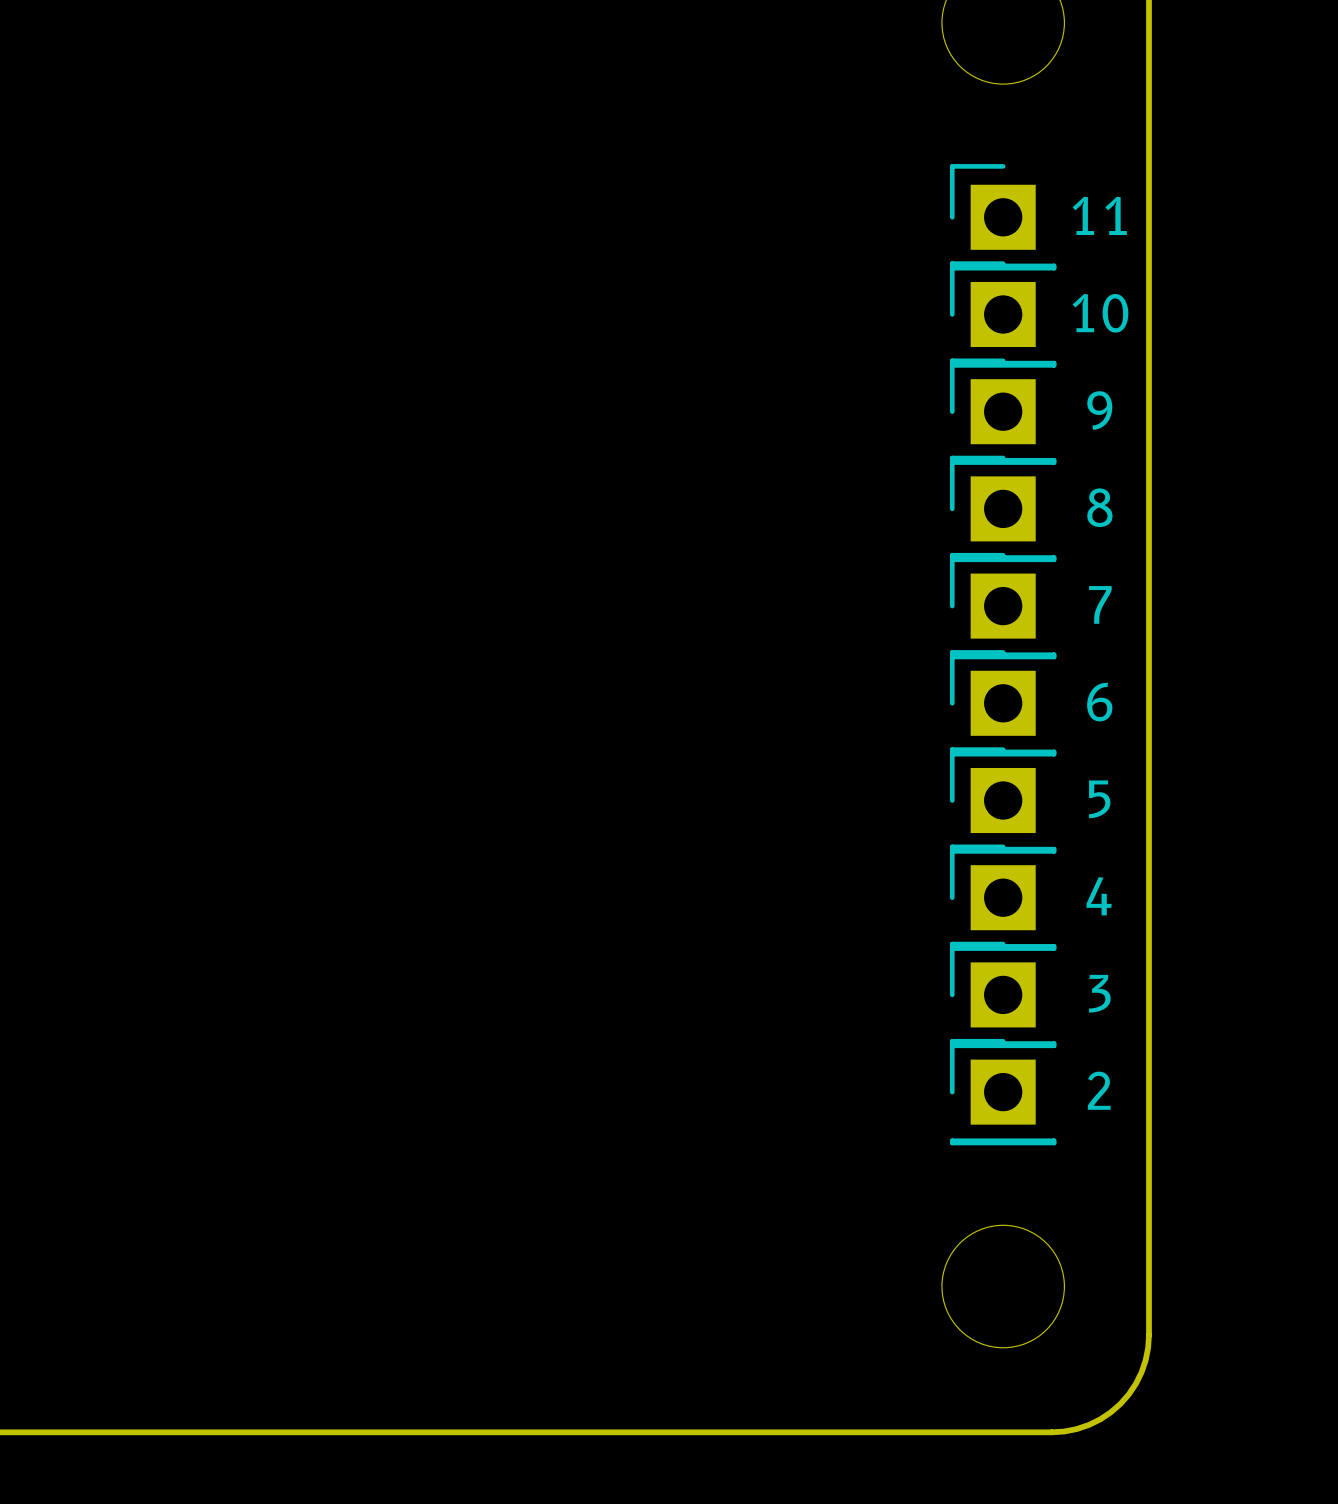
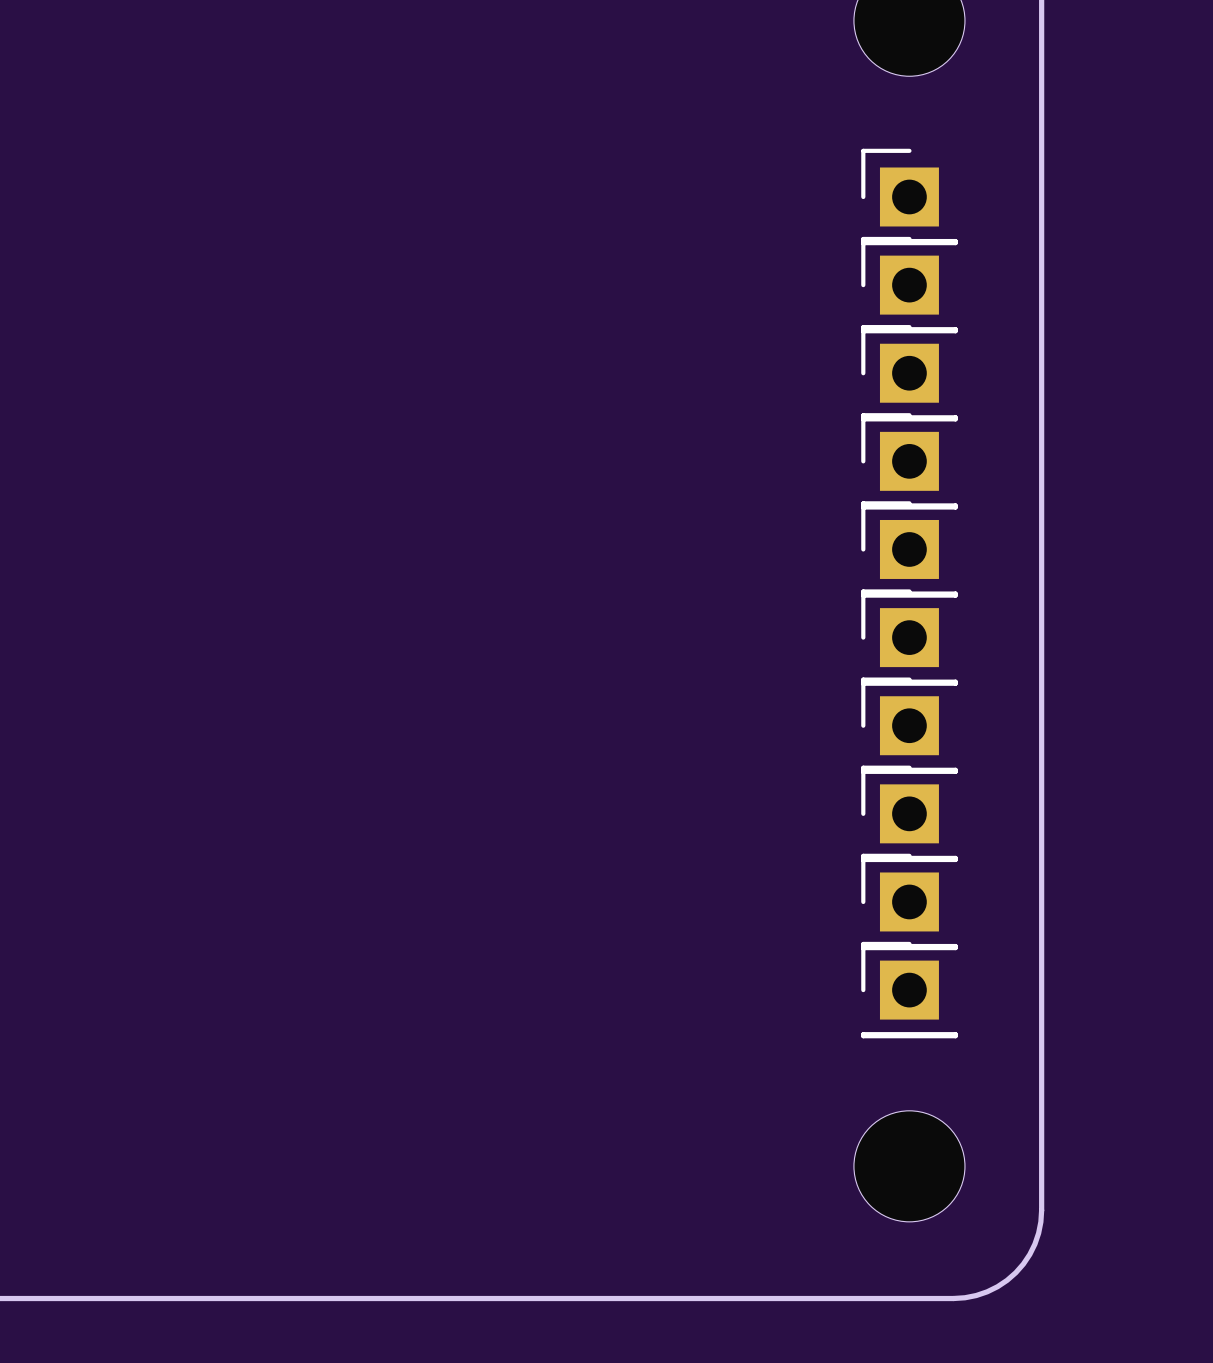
text: 11 (1099, 215) -> none
text: 10 (1100, 313) -> none
text: 9 (1099, 410) -> none
text: 8 (1099, 507) -> none
text: 7 (1100, 604) -> none
text: 6 (1099, 702) -> none
text: 5 (1099, 799) -> none
text: 4 (1099, 896) -> none
text: 3 (1099, 993) -> none
text: 2 (1099, 1090) -> none

